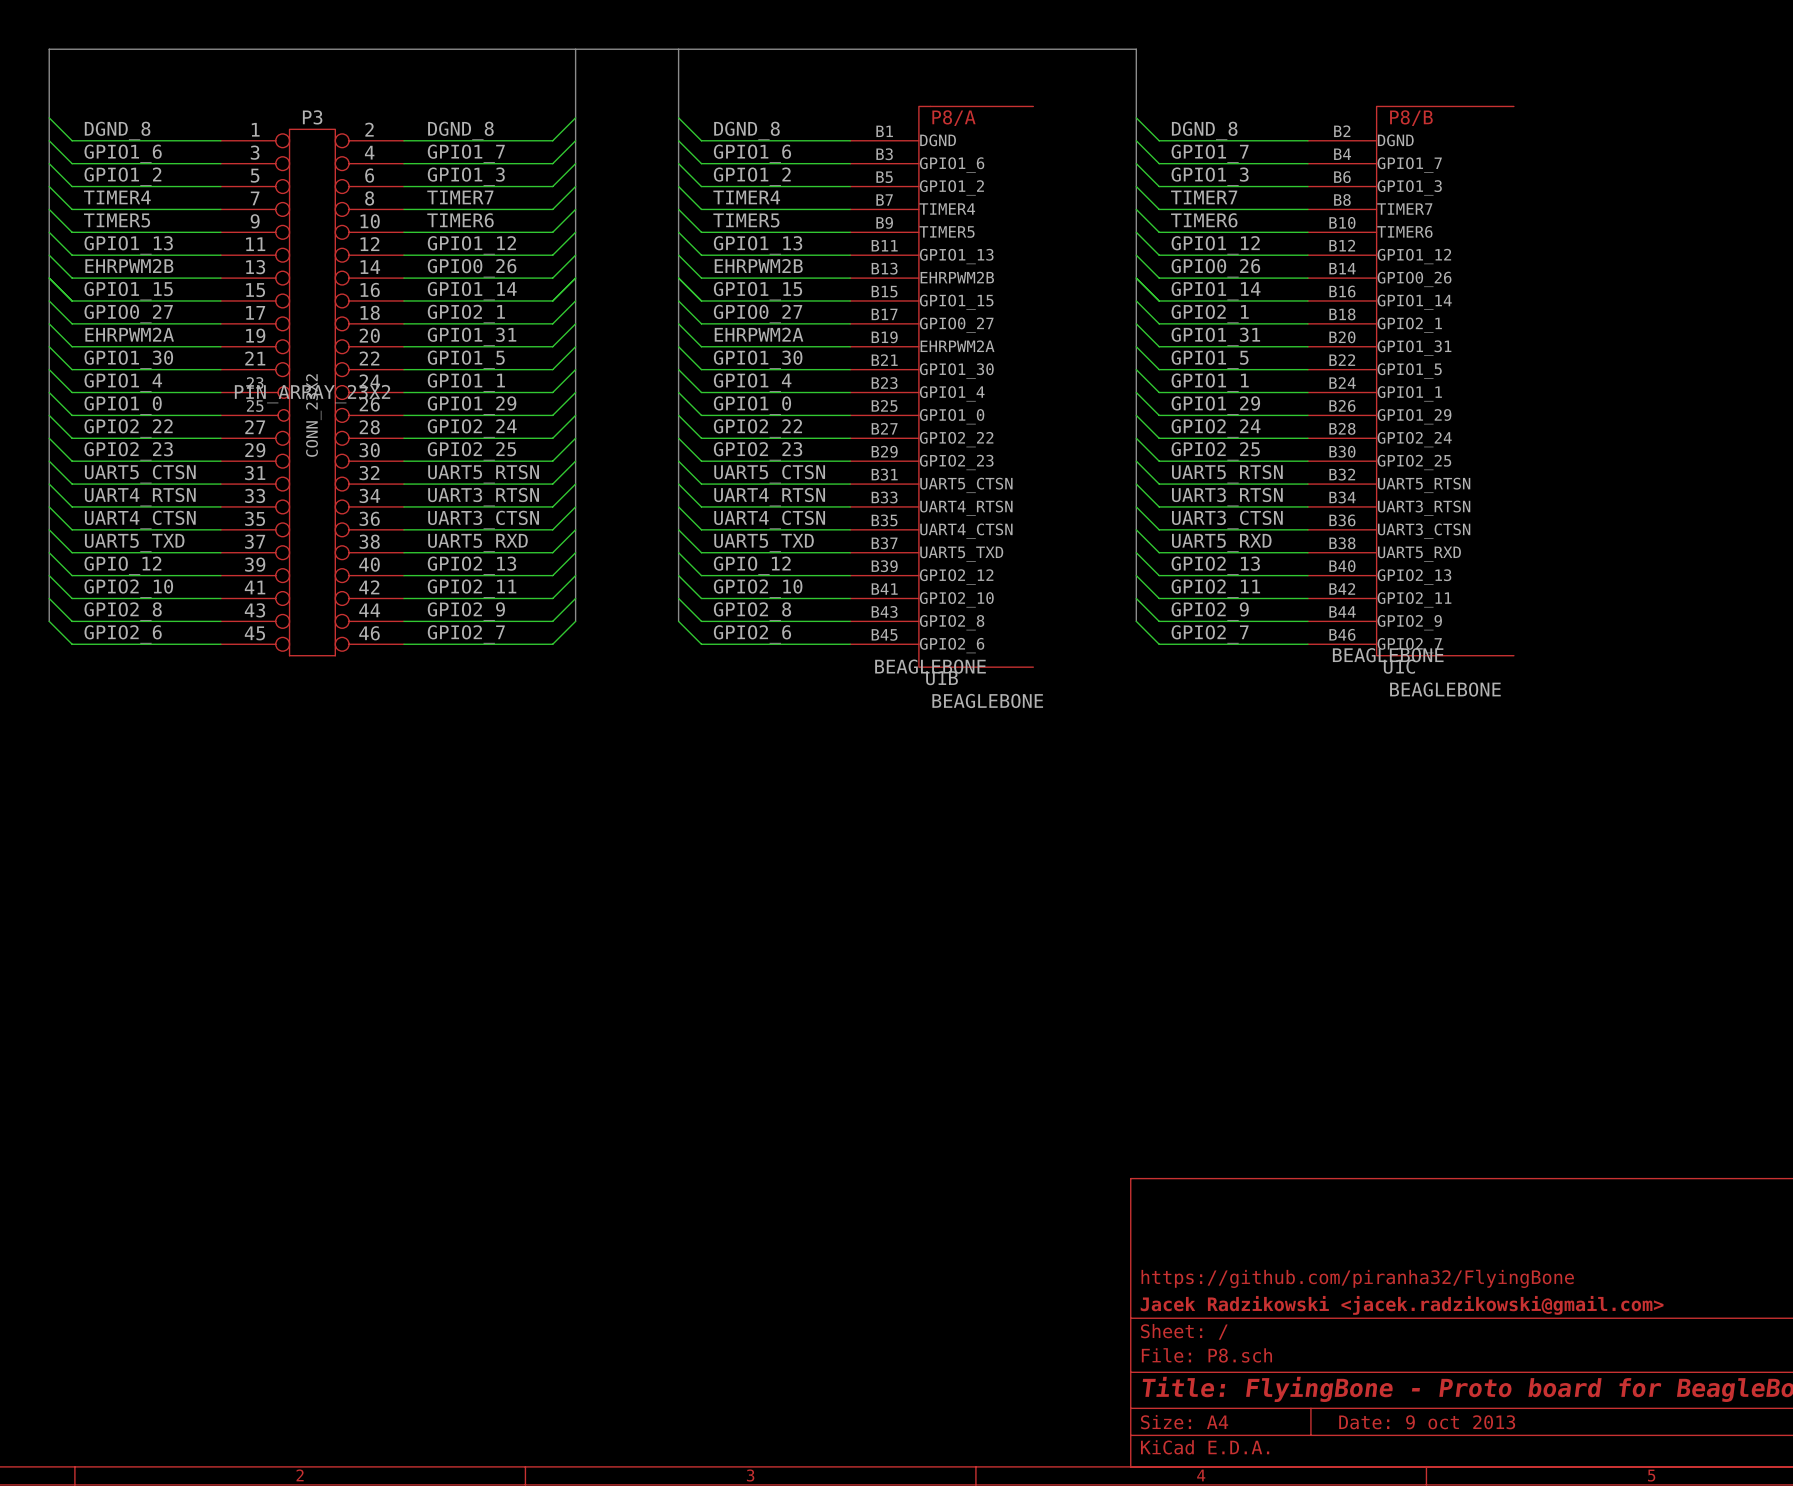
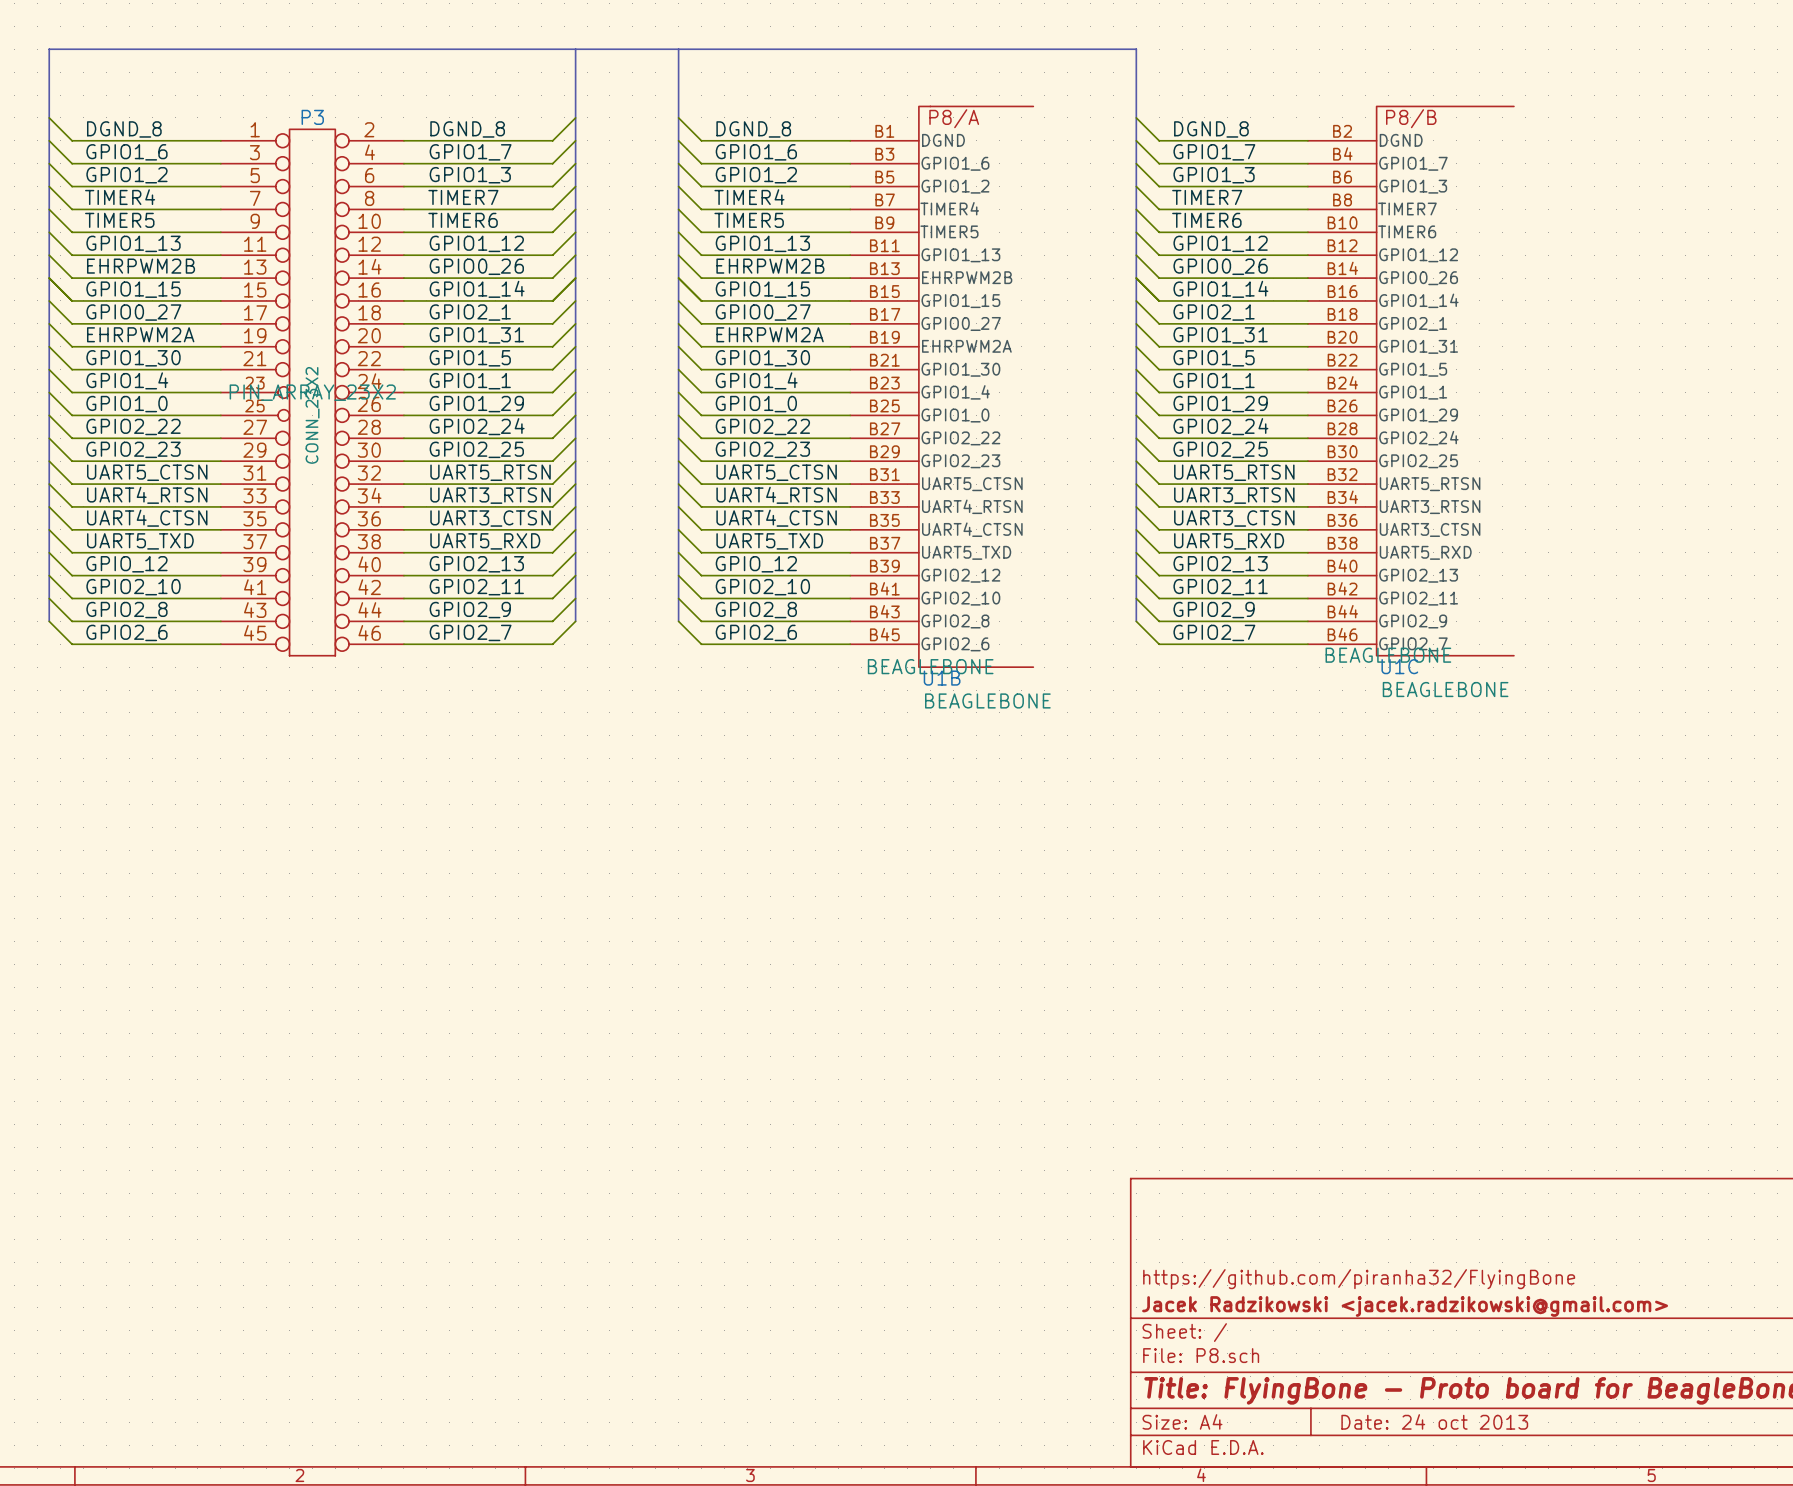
title block: Date: 9 oct 2013 (1427, 1422) -> Date: 24 oct 2013 (1434, 1421)

